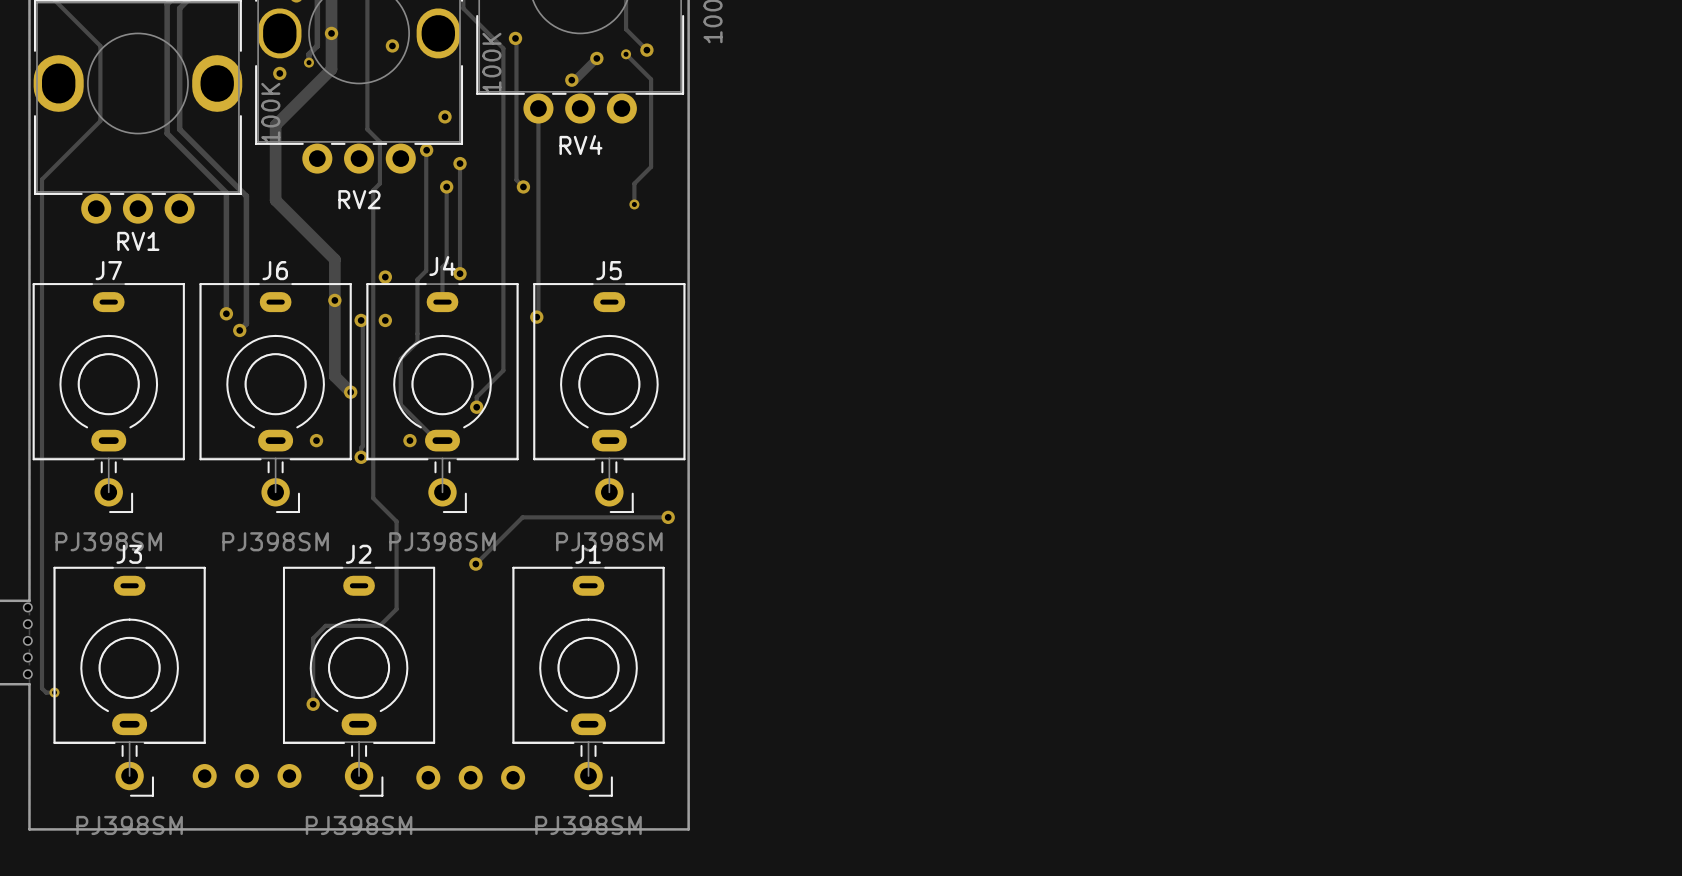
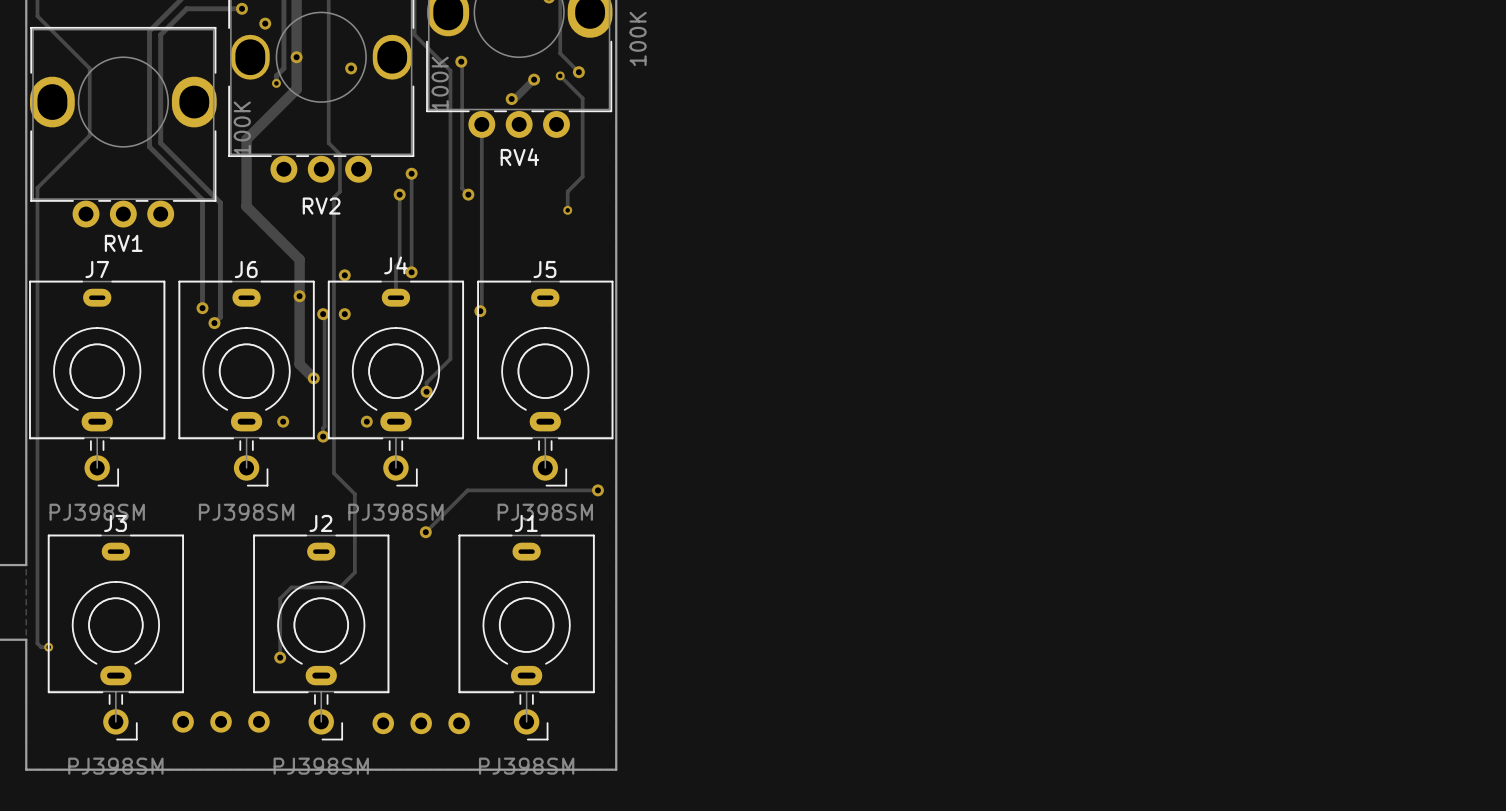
via: (279, 73) -> none
via: (445, 116) -> none
track: (426, 150) (426, 270) (417, 279) (417, 342) (400, 358) (400, 404) (436, 440) (442, 440) -> none
via: (426, 150) -> none
part: (27, 640) -> none

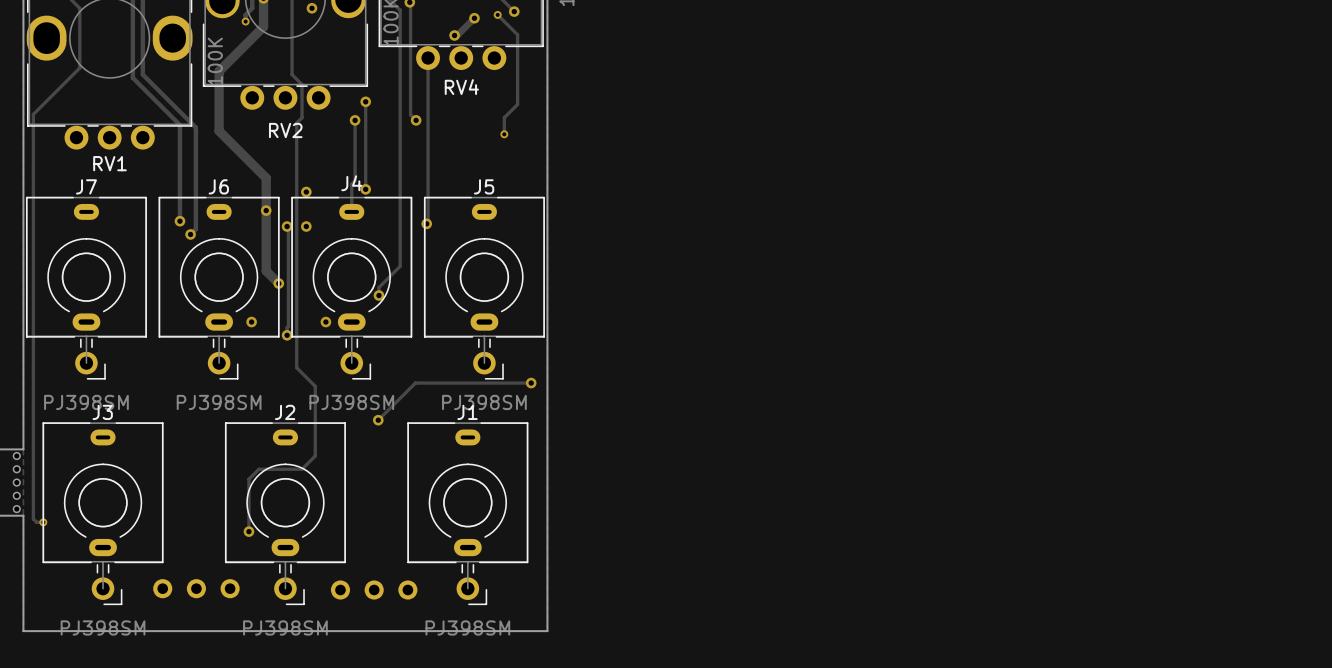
part: none -> (16, 456)
part: none -> (16, 469)
part: none -> (16, 482)
part: none -> (16, 495)
part: none -> (16, 509)

